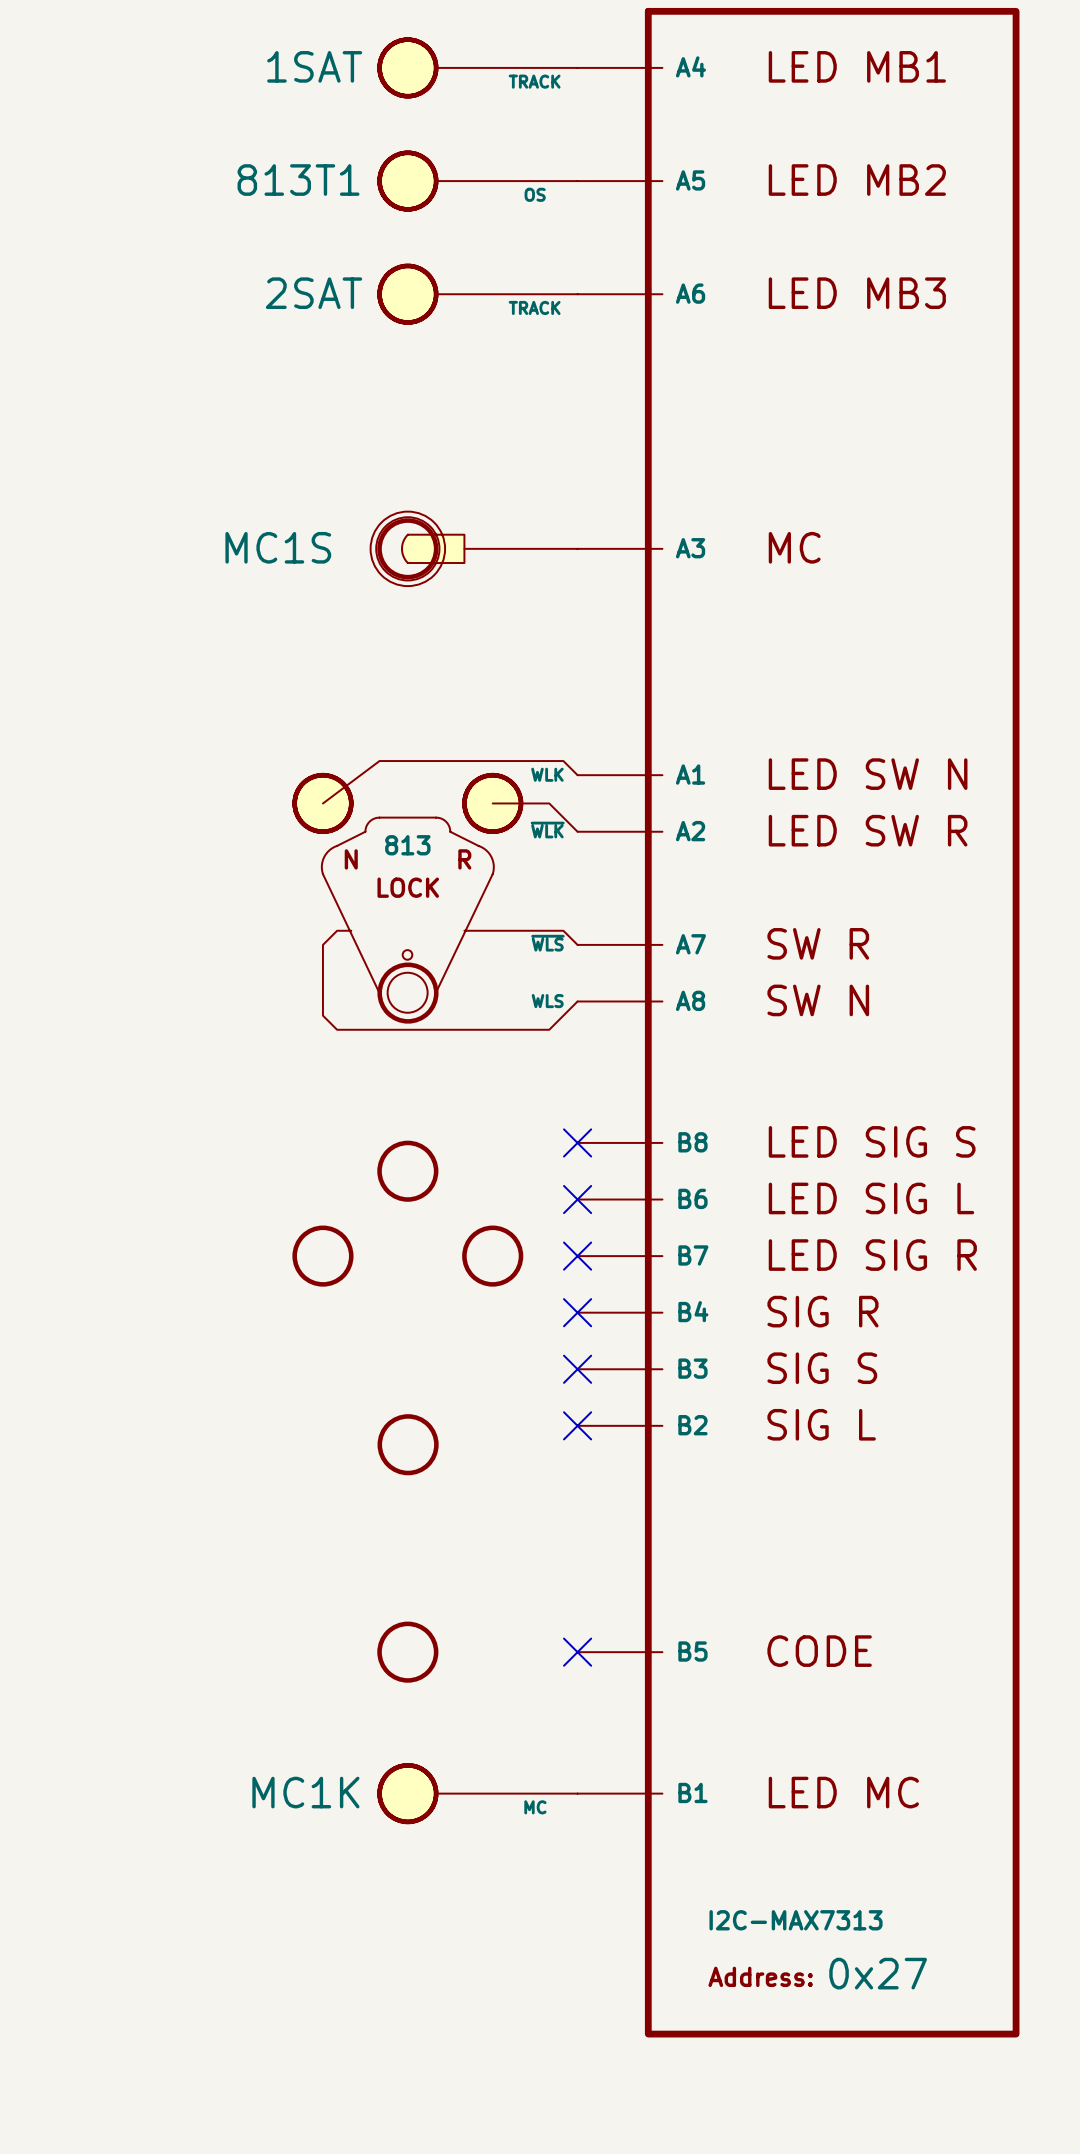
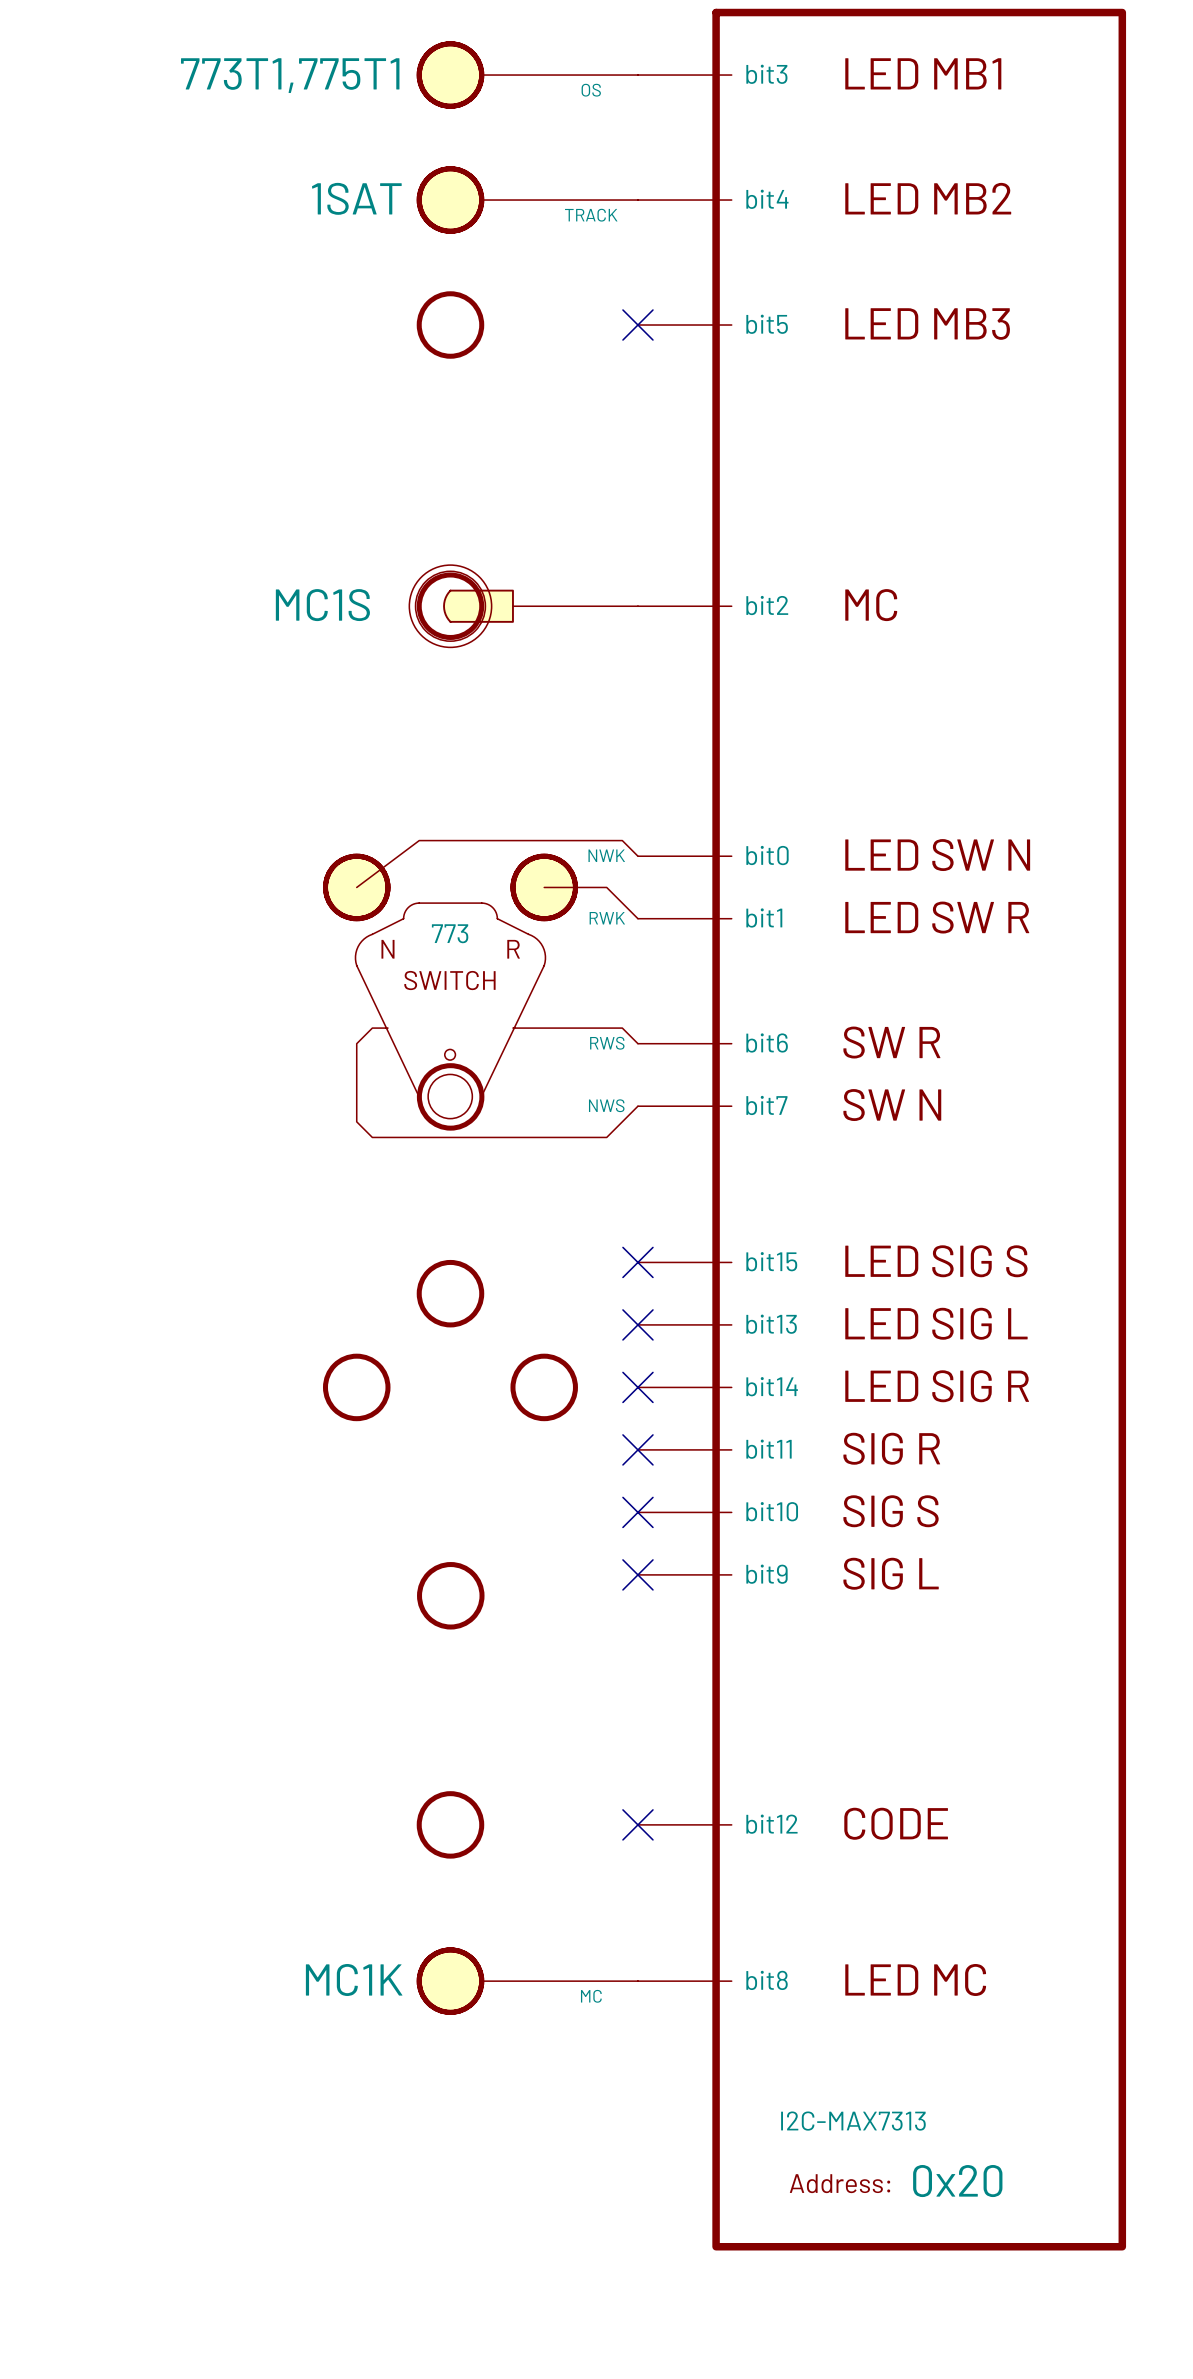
part symbol: [577, 7, 1020, 2038] -> [637, 8, 1127, 2251]
part text: 1SAT (314, 66) -> 773T1,775T1 (290, 75)
part value: TRACK (534, 81) -> OS (591, 90)
part text: 813T1 (298, 180) -> 1SAT (356, 198)
part value: OS (535, 194) -> TRACK (591, 215)
part: TRACK (477, 294) -> none
no-connect mark: none -> (637, 325)
part pin name: WLK (547, 774) -> NWK (606, 855)
part pin name: ~{WLK} (547, 830) -> RWK (607, 918)
part value: 813 (407, 845) -> 773 (450, 933)
part text: LOCK (408, 887) -> SWITCH (449, 980)
part pin name: ~{WLS} (547, 943) -> RWS (607, 1043)
part pin name: WLS (547, 1001) -> NWS (606, 1105)
part text: 0x27 (878, 1973) -> 0x20 (957, 2181)

